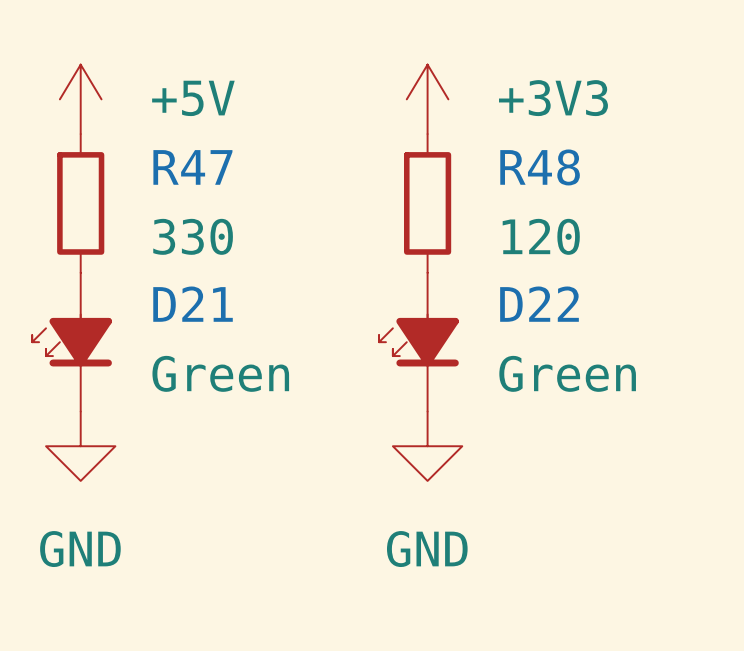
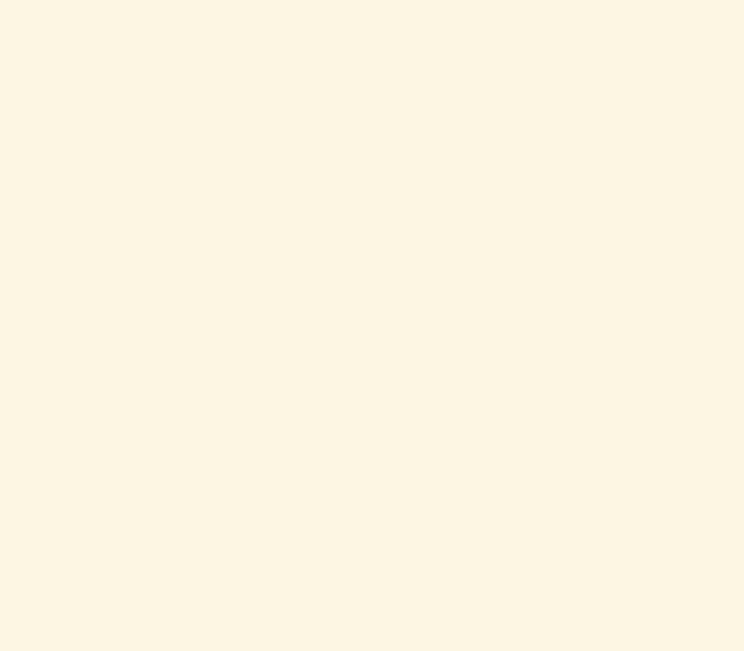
power symbol: +5V (80, 99) -> none
power symbol: +3V3 (427, 99) -> none
R47: 330 (80, 203) -> none
R48: 120 (427, 203) -> none
D21: Green (72, 342) -> none
D22: Green (418, 342) -> none
power symbol: GND (80, 446) -> none
power symbol: GND (427, 446) -> none

